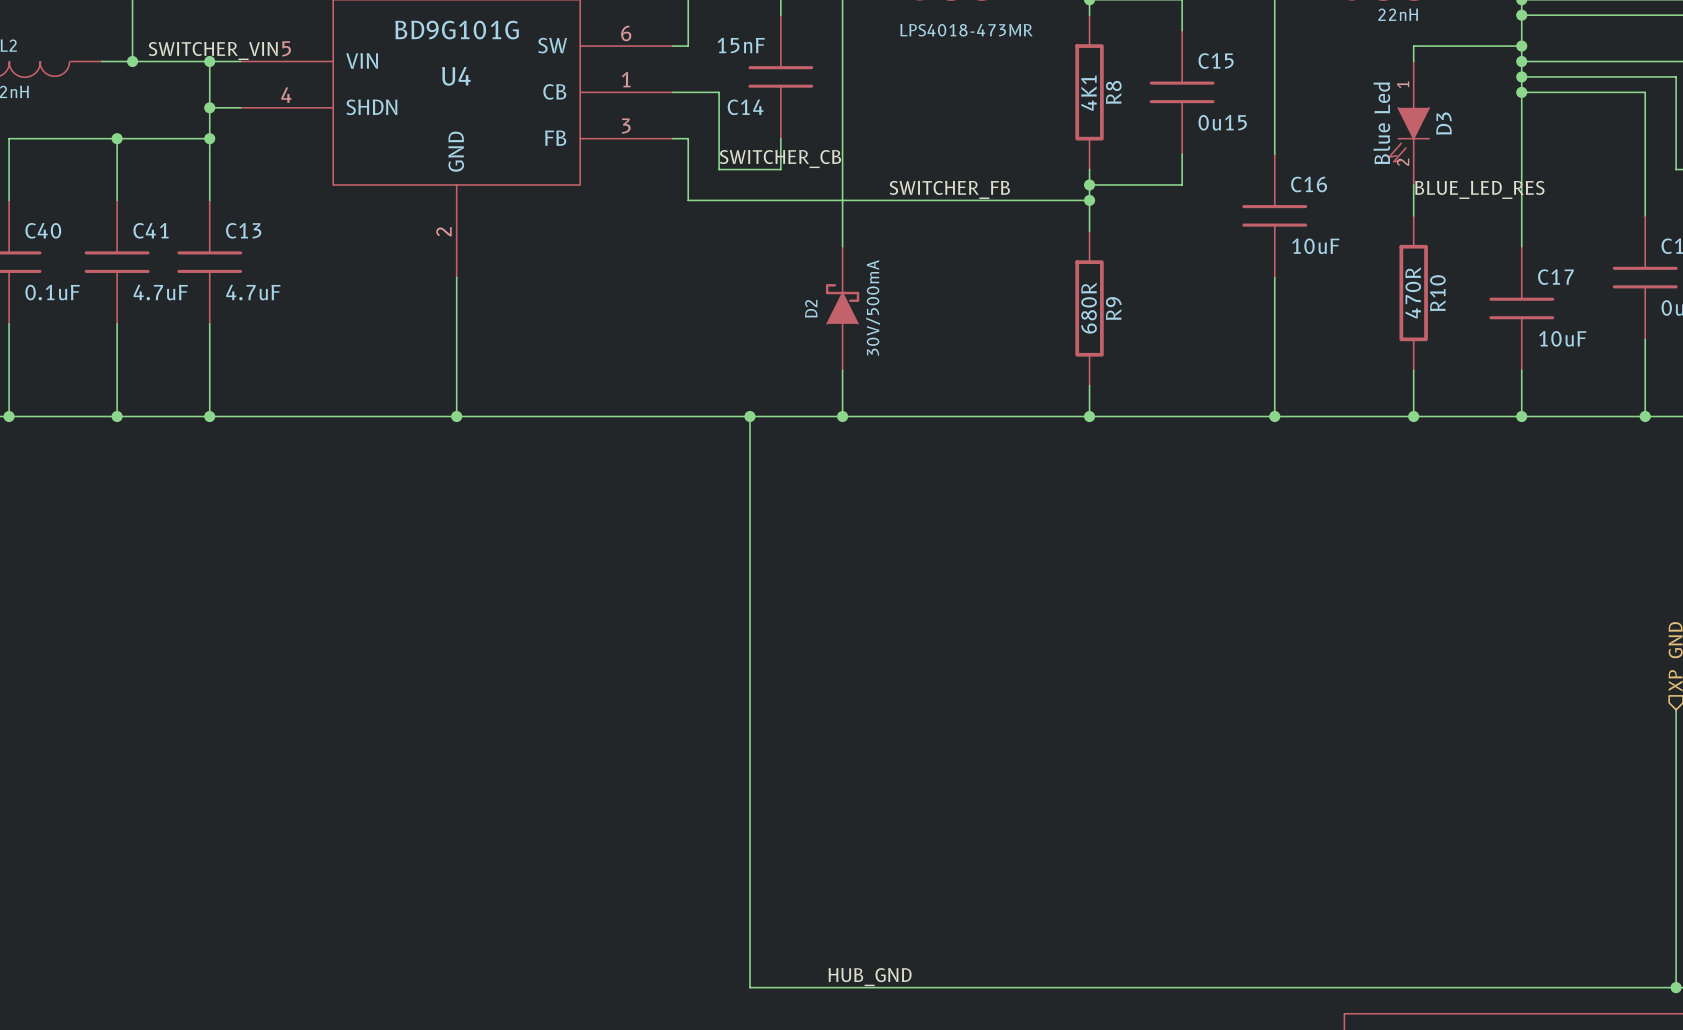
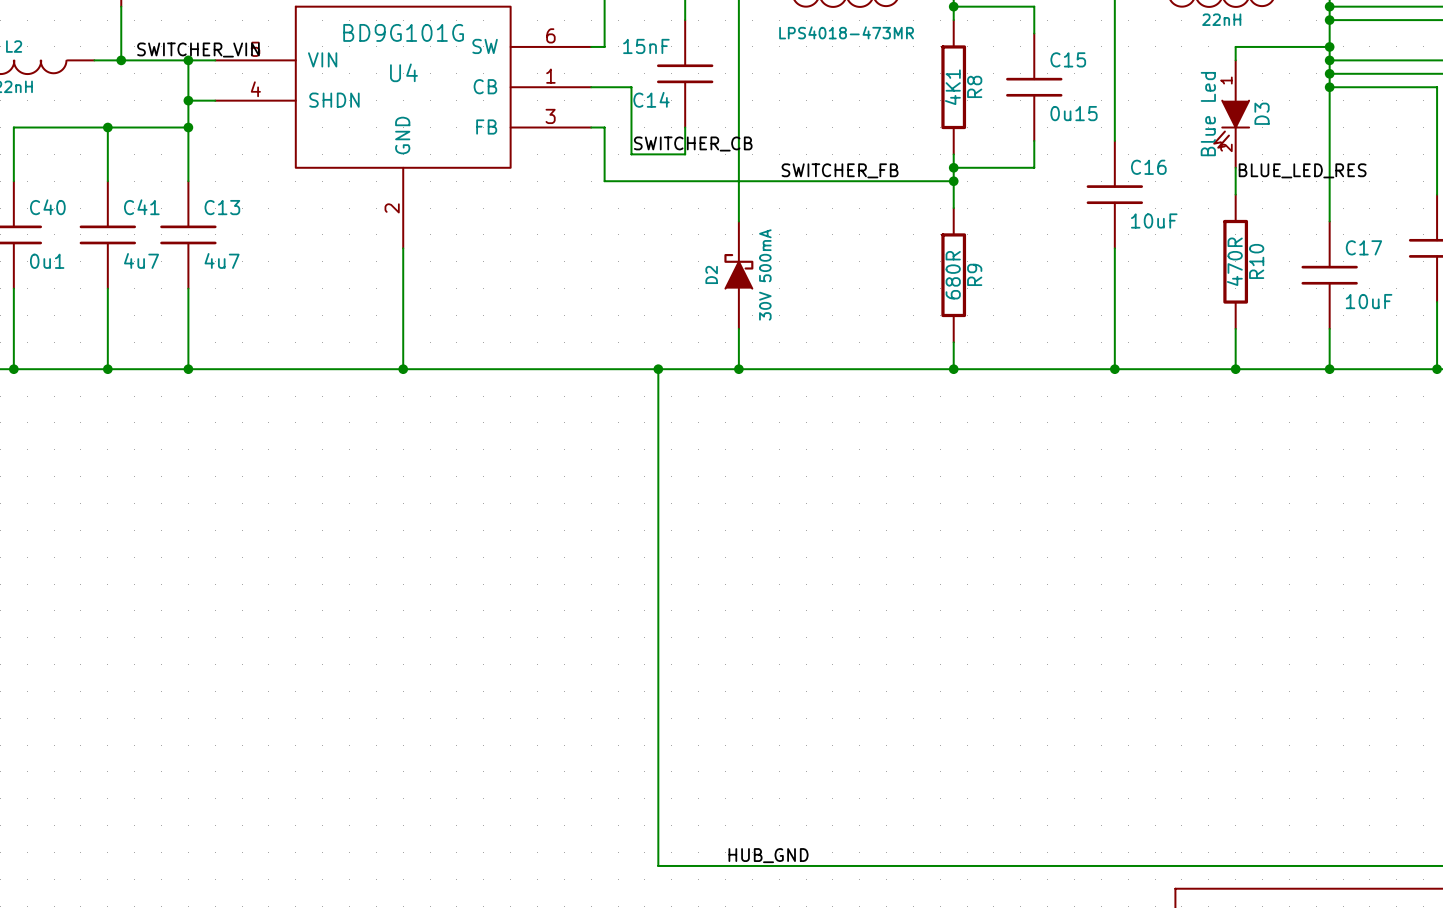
C40 value: 0.1uF (52, 292) -> 0u1 (47, 261)
C41 value: 4.7uF (160, 292) -> 4u7 (141, 260)
C13 value: 4.7uF (253, 292) -> 4u7 (222, 260)
D2 value: 30V/500mA (873, 307) -> 30V 500mA (765, 274)

